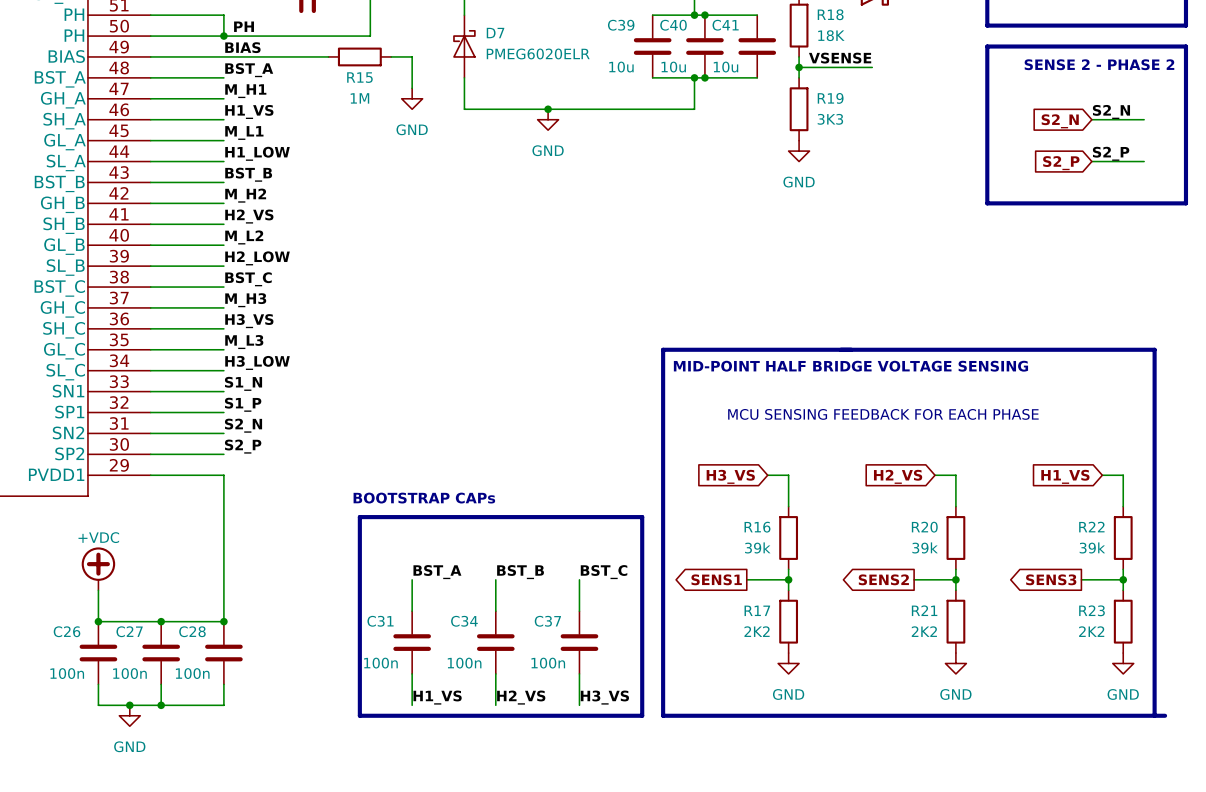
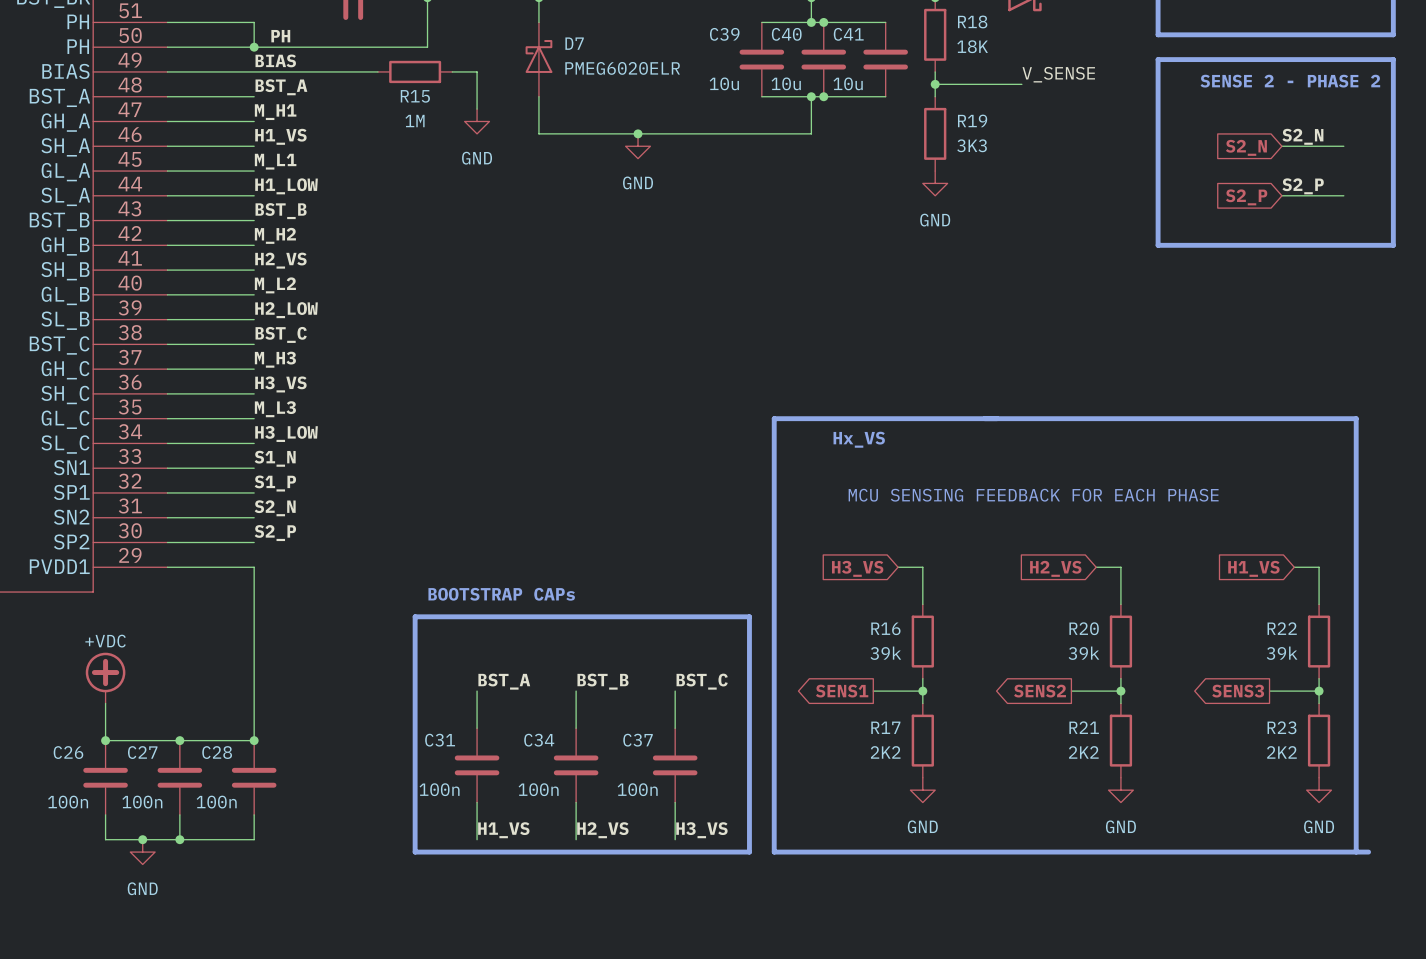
label: VSENSE (840, 58) -> V_SENSE (1058, 74)
text: MID-POINT HALF BRIDGE VOLTAGE SENSING (850, 366) -> none
text: none -> Hx_VS (859, 439)

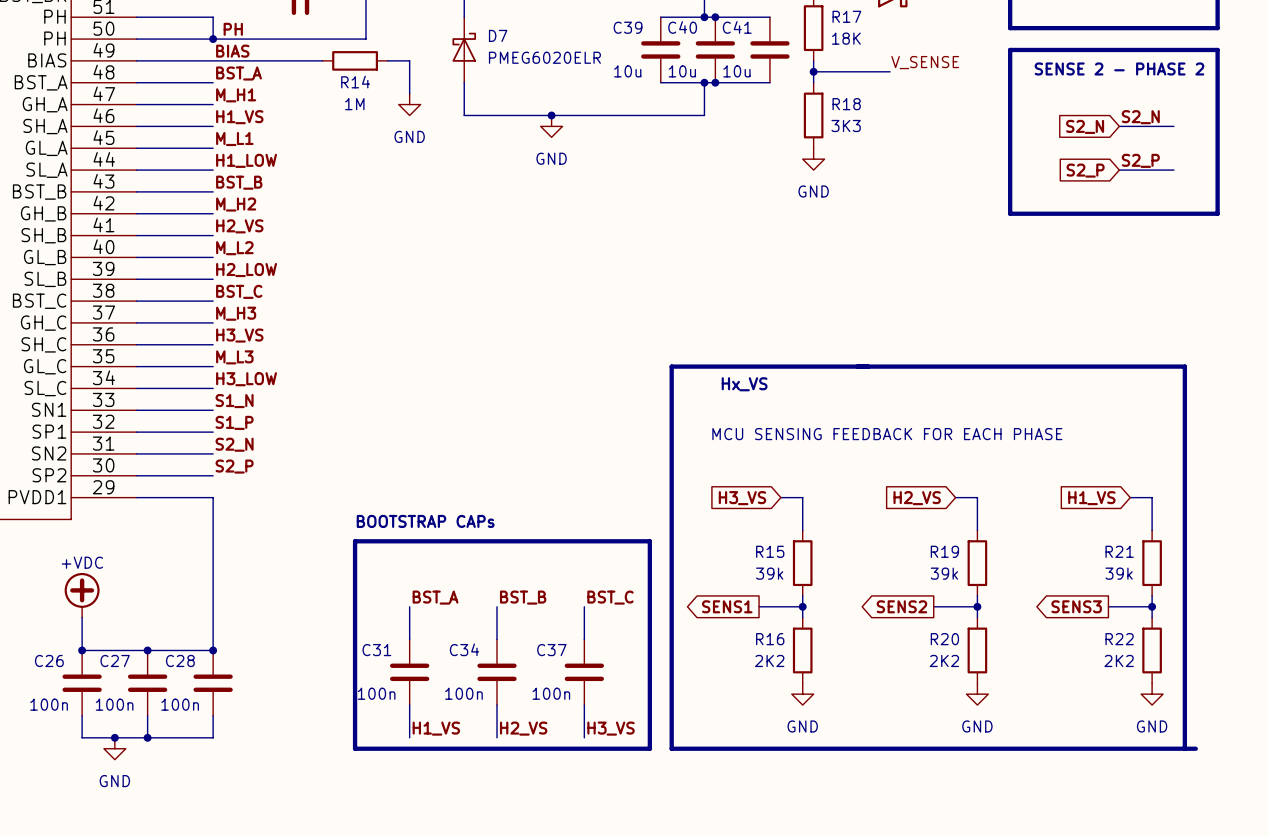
R18 name: R18 (972, 21) -> R17 (846, 16)
R15 name: R15 (415, 96) -> R14 (355, 82)
R19 name: R19 (972, 120) -> R18 (846, 104)
R16 name: R16 (885, 628) -> R15 (770, 551)
R20 name: R20 (1084, 628) -> R19 (944, 551)
R22 name: R22 (1282, 628) -> R21 (1119, 551)
R17 name: R17 (885, 727) -> R16 (770, 639)
R21 name: R21 (1084, 727) -> R20 (944, 639)
R23 name: R23 (1281, 727) -> R22 (1119, 639)

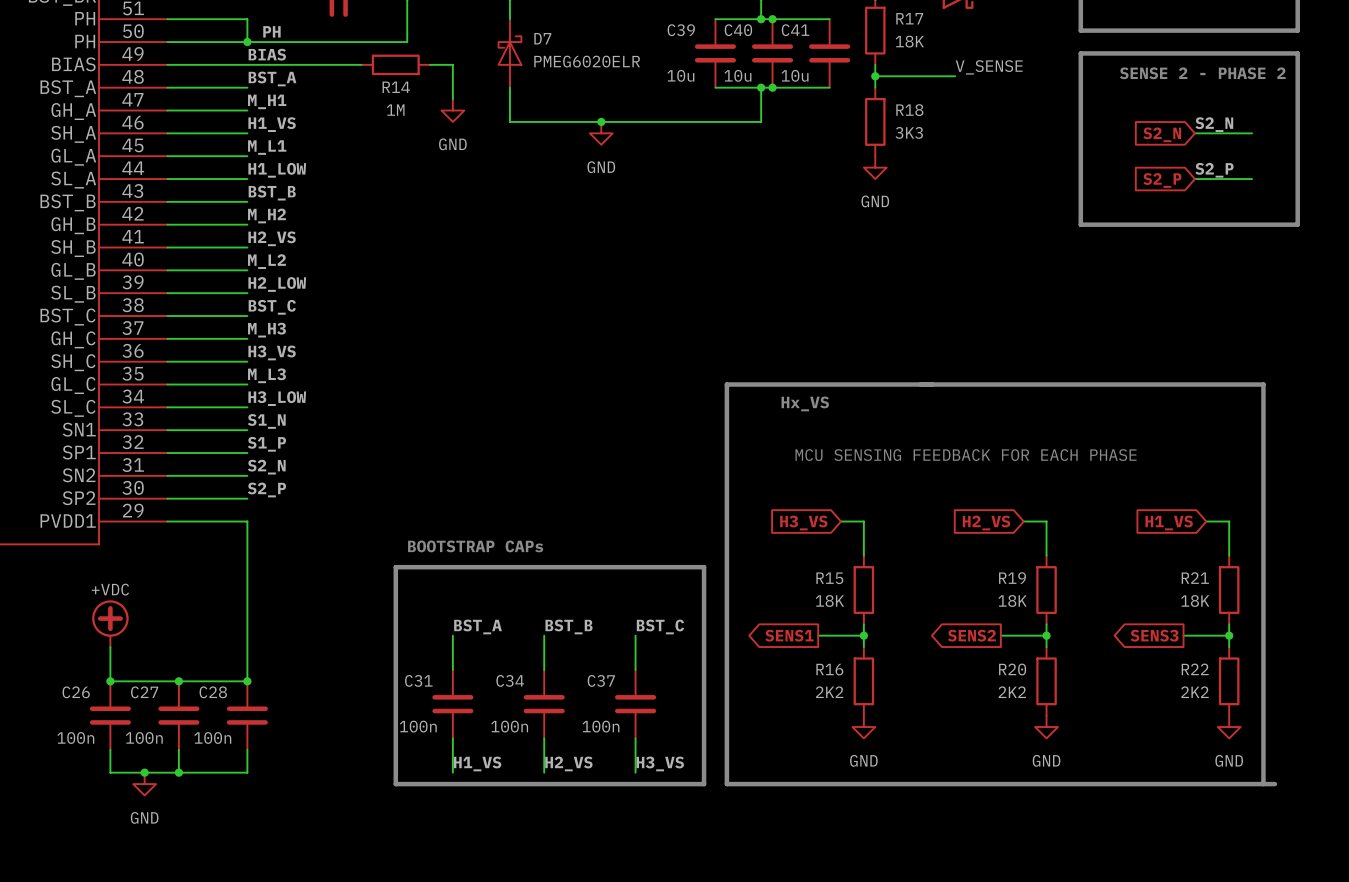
R15 value: 39k (769, 573) -> 18K (829, 601)
R19 value: 39k (944, 573) -> 18K (1012, 601)
R21 value: 39k (1119, 573) -> 18K (1195, 601)

